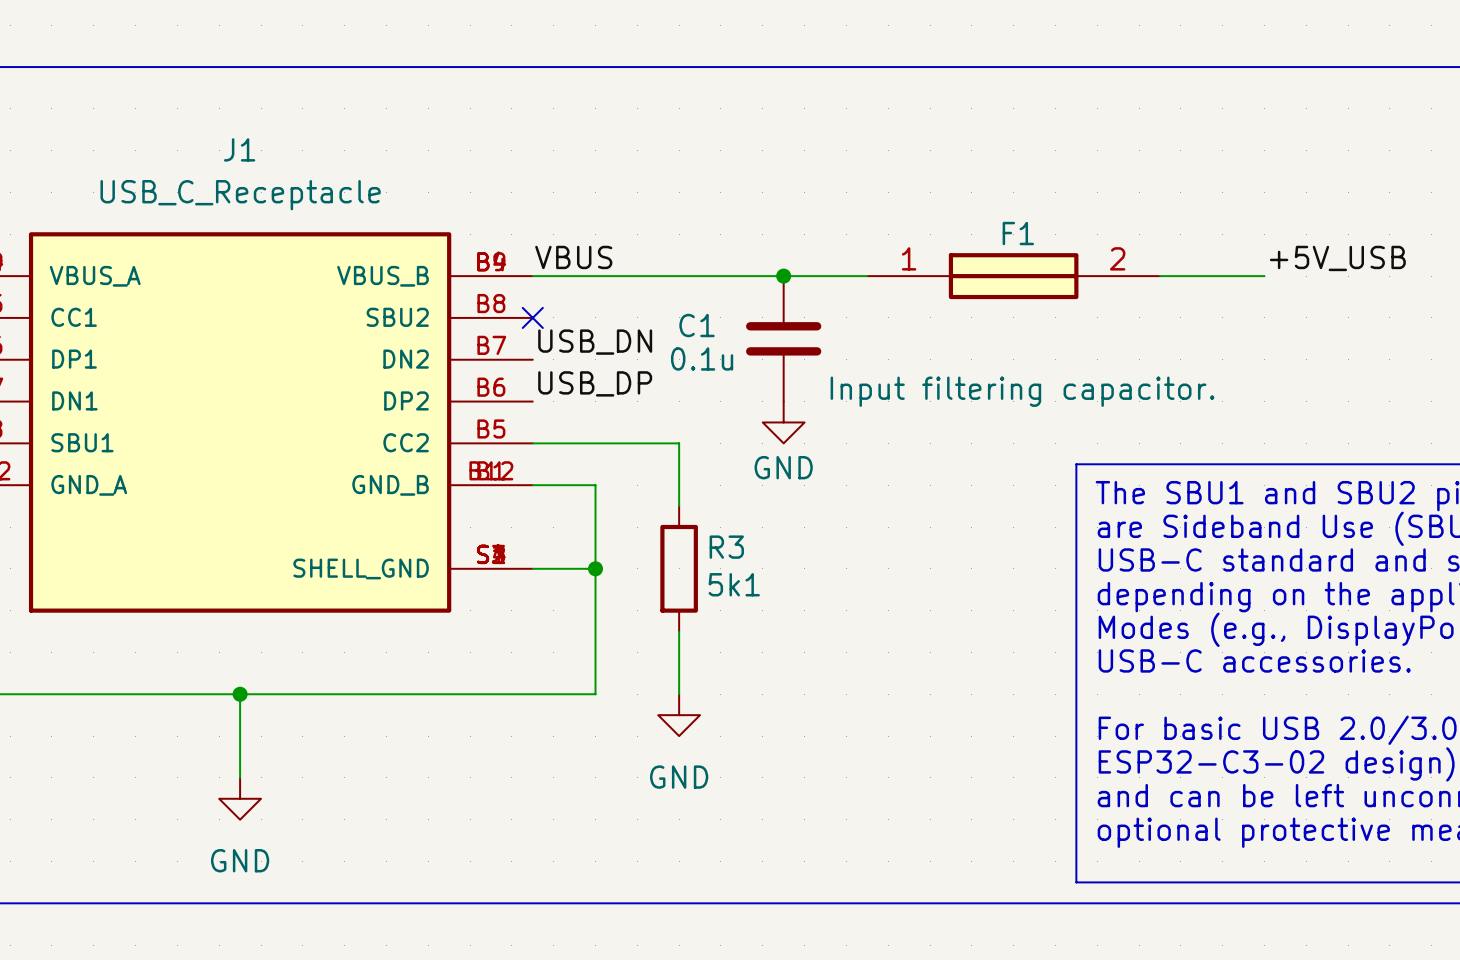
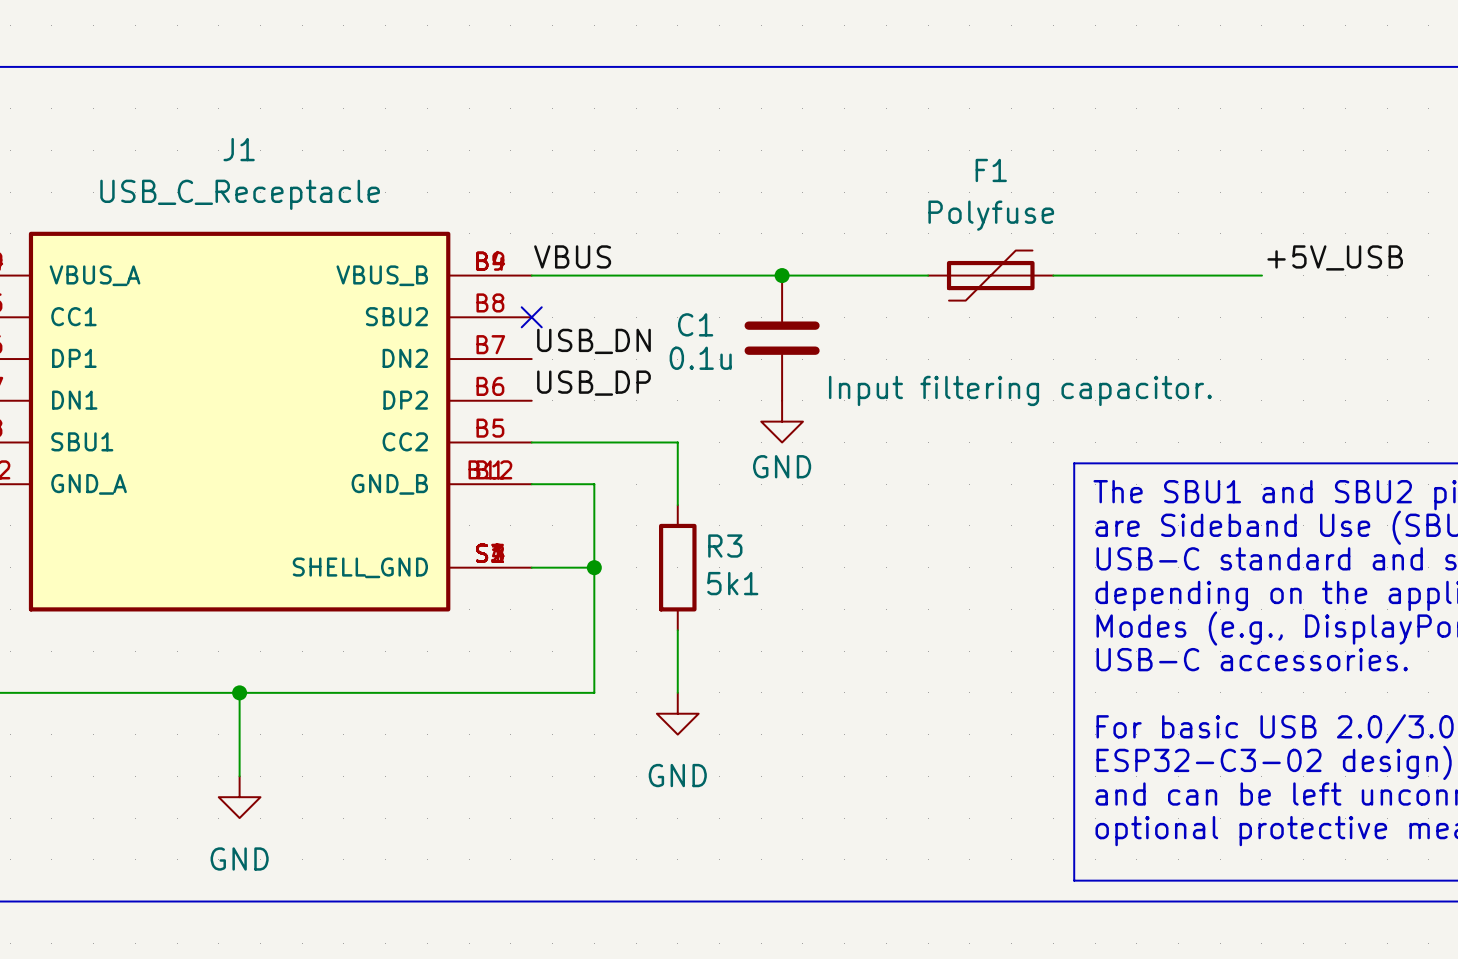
F1 value: none -> Polyfuse (991, 215)
F1 name position: F1 (1018, 233) -> F1 (991, 170)
F1 symbol: [867, 253, 1160, 300] -> [928, 250, 1054, 301]

